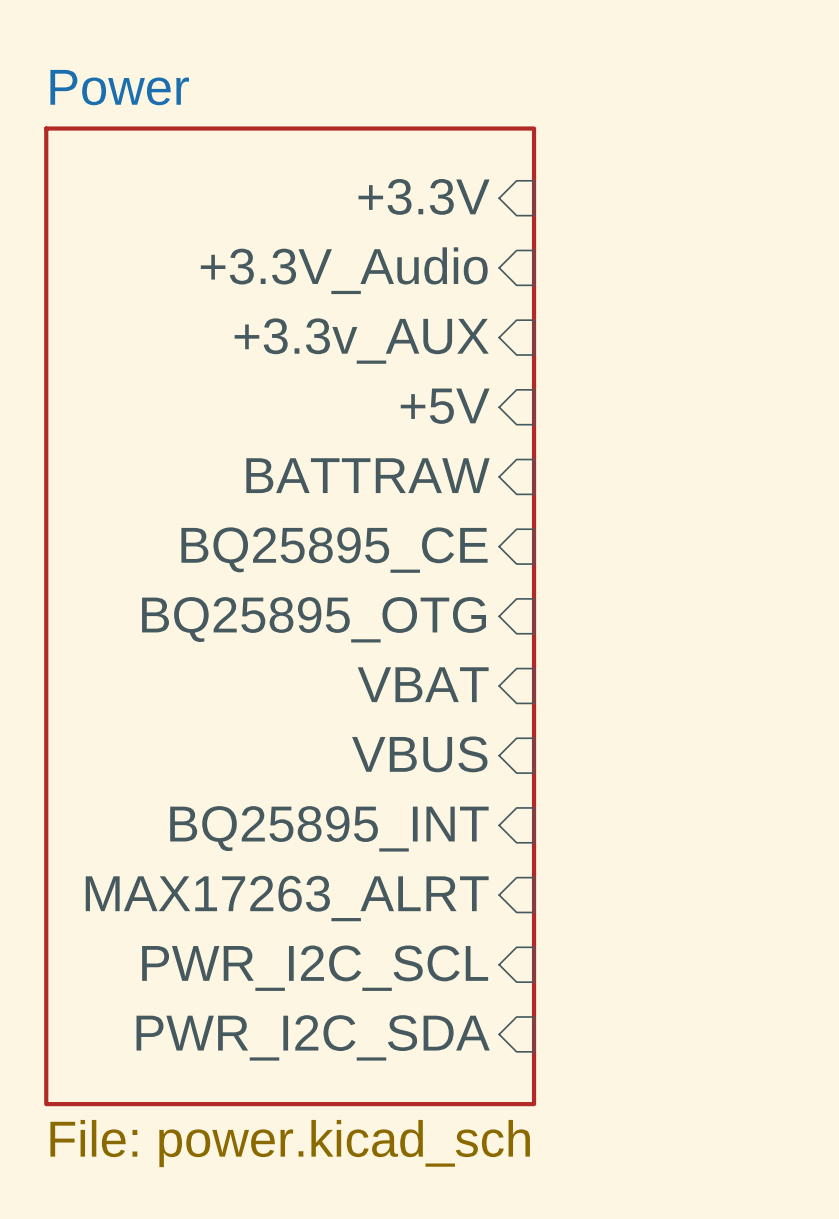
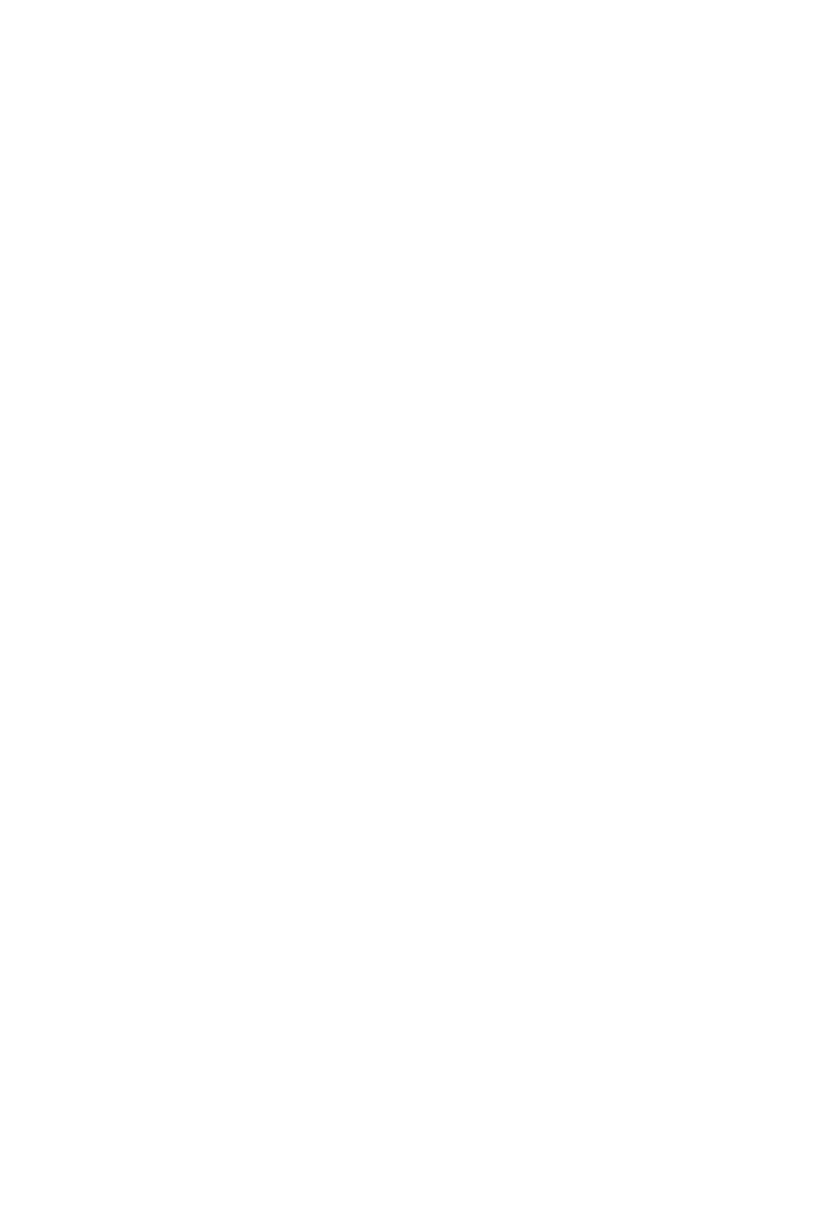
sheet pin: +3.3V (424, 196) -> none
sheet pin: +3.3V_Audio (344, 270) -> none
sheet pin: +3.3v_AUX (361, 341) -> none
sheet pin: +5V (445, 406) -> none
sheet pin: BATTRAW (367, 475) -> none
sheet pin: BQ25895_CE (334, 550) -> none
sheet Power: File: power.kicad_sch (290, 616) -> none
sheet pin: BQ25895_OTG (314, 619) -> none
sheet pin: VBAT (423, 684) -> none
sheet pin: VBUS (419, 754) -> none
sheet pin: BQ25895_INT (329, 828) -> none
sheet pin: MAX17263_ALRT (287, 898) -> none
sheet pin: PWR_I2C_SCL (315, 968) -> none
sheet pin: PWR_I2C_SDA (313, 1037) -> none

